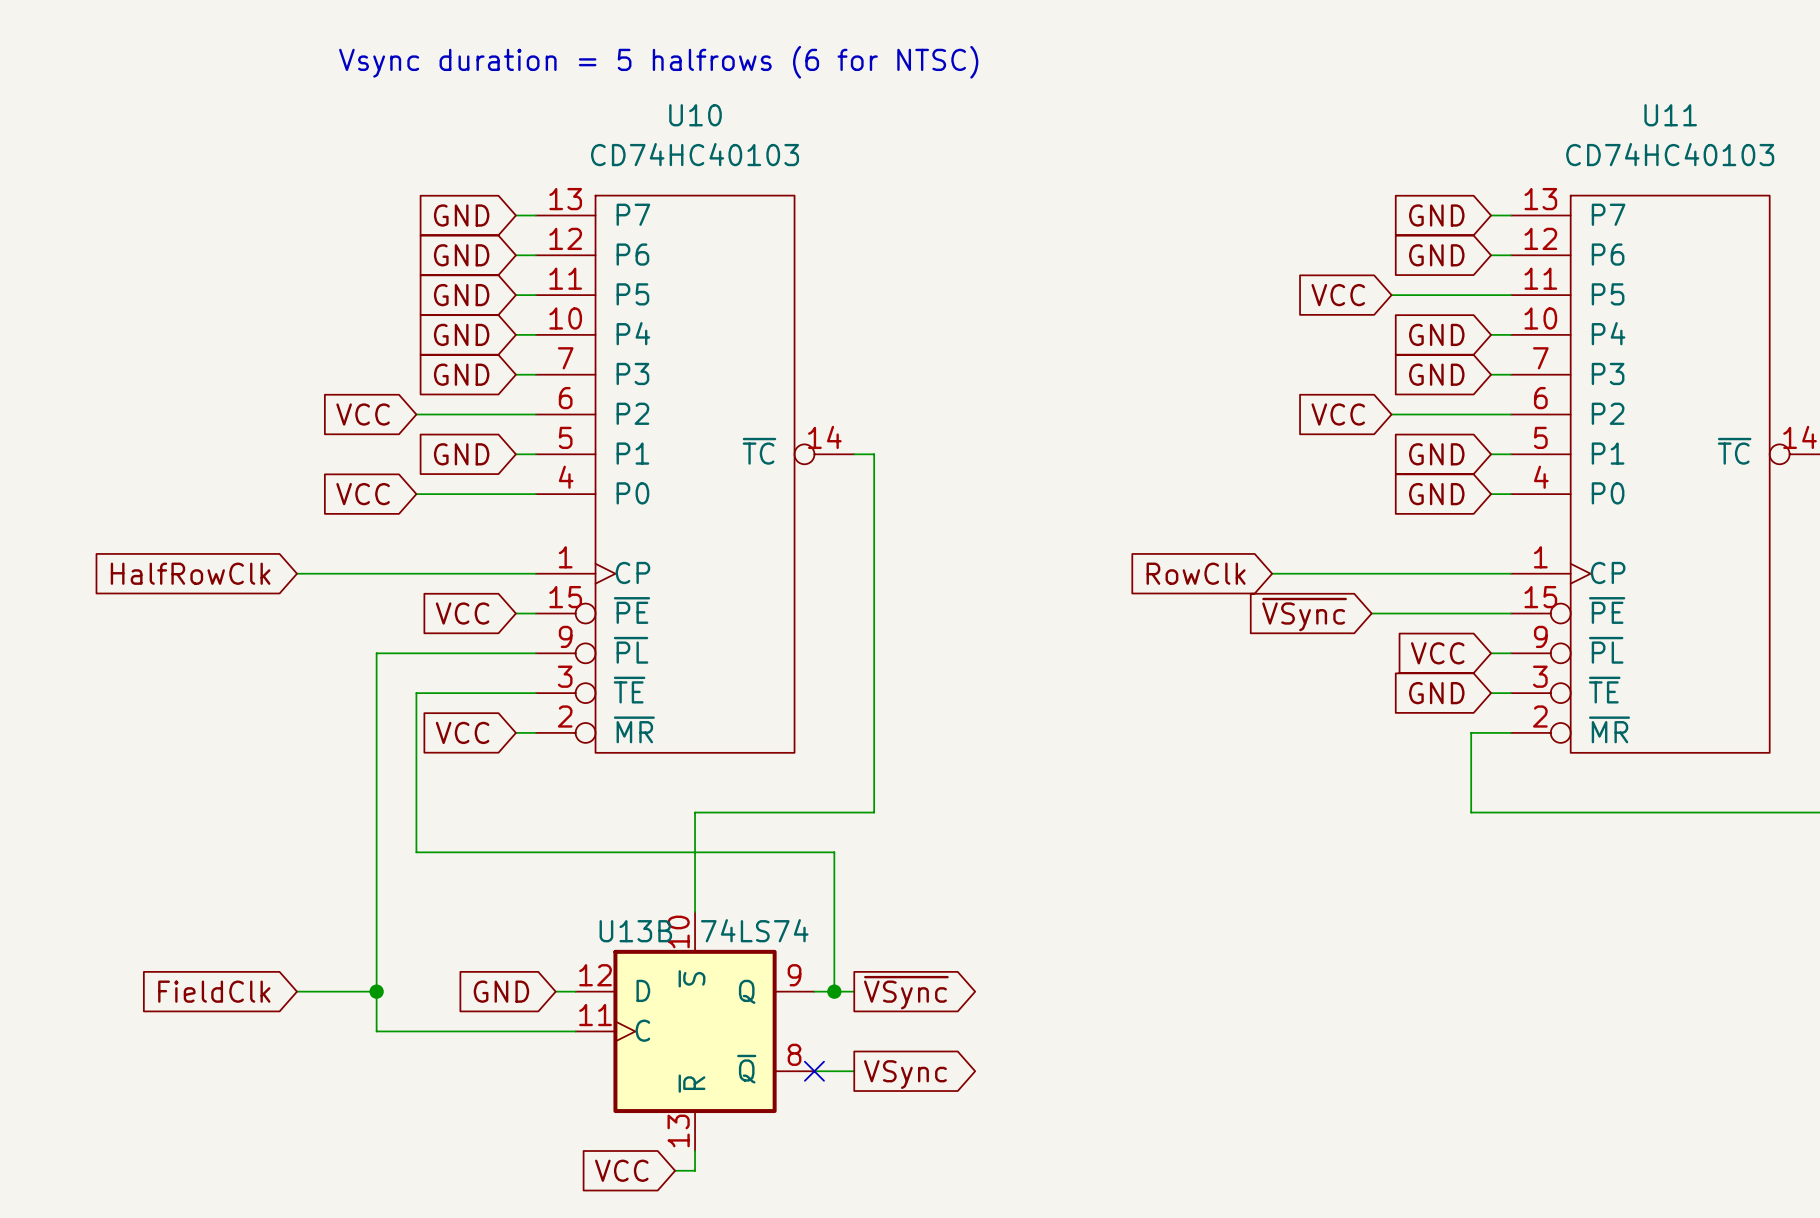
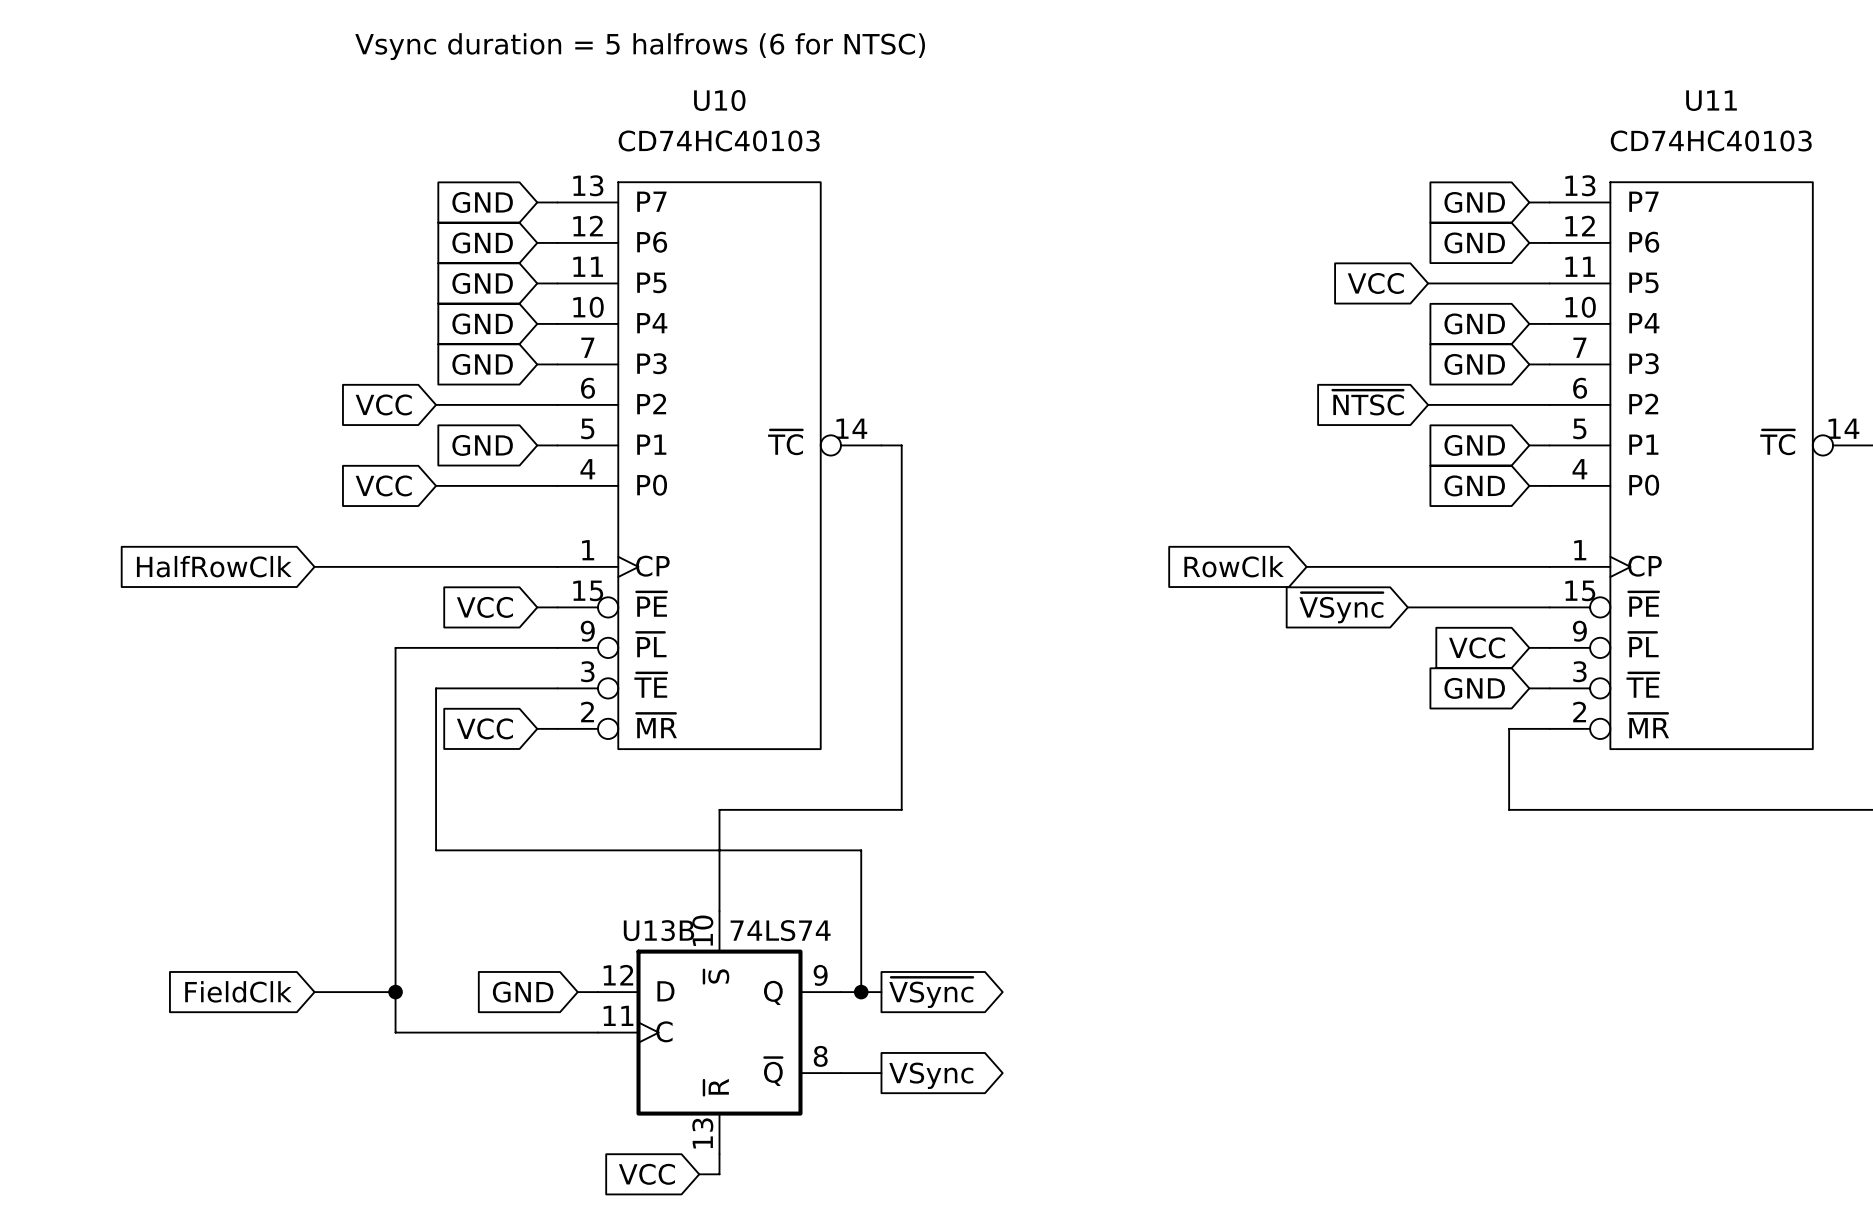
global label: VCC (1338, 414) -> ~{NTSC} (1368, 402)
no-connect mark: (814, 1071) -> none

